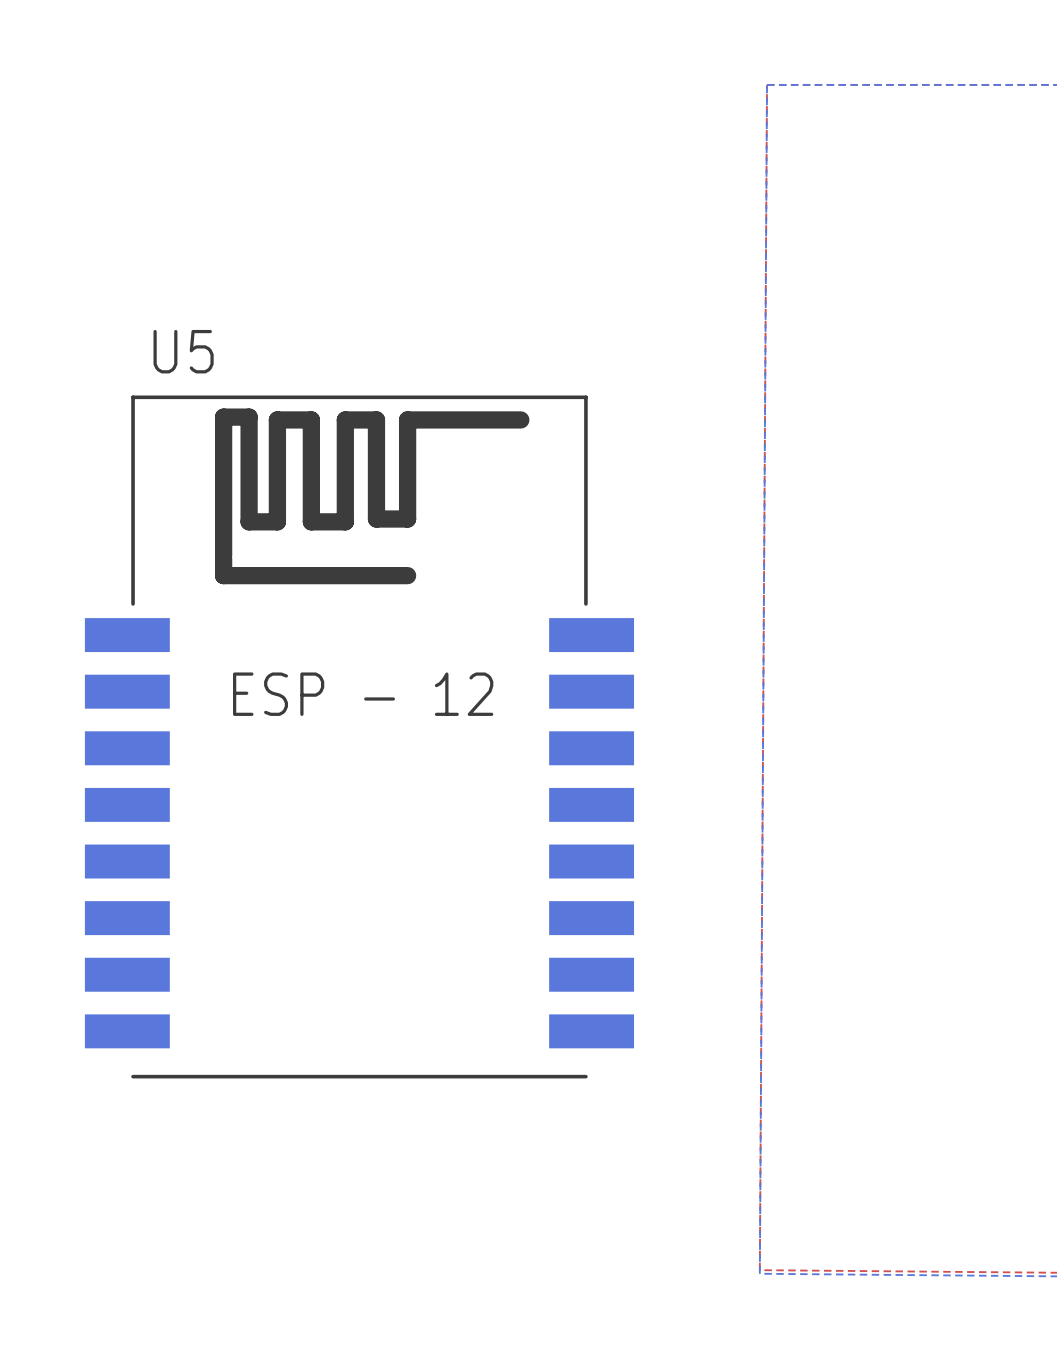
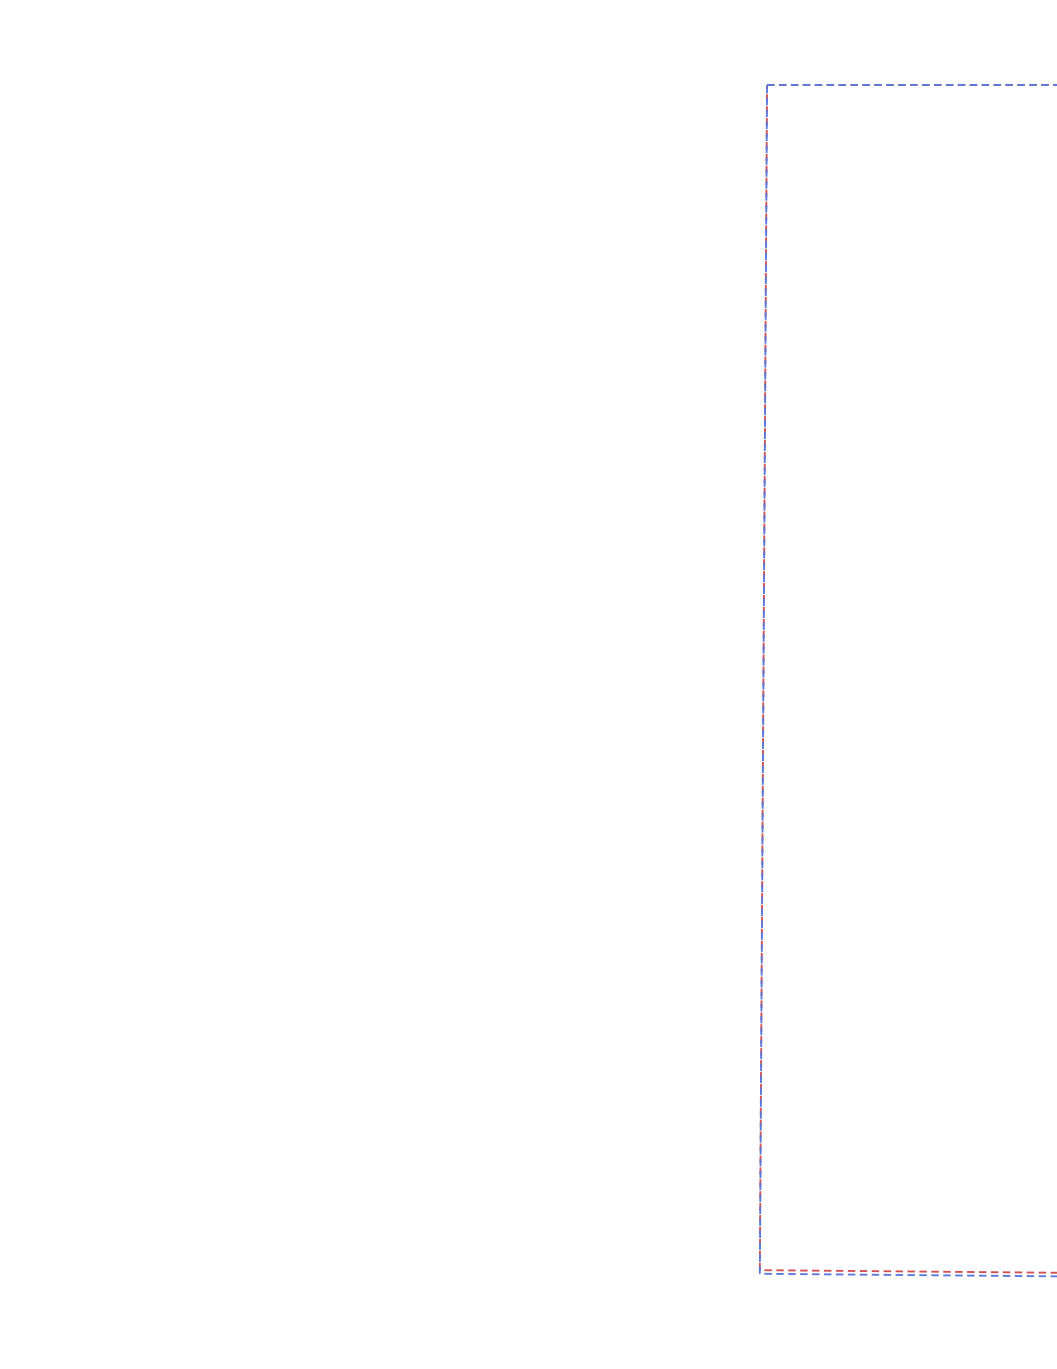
U5: (359, 736) -> none

